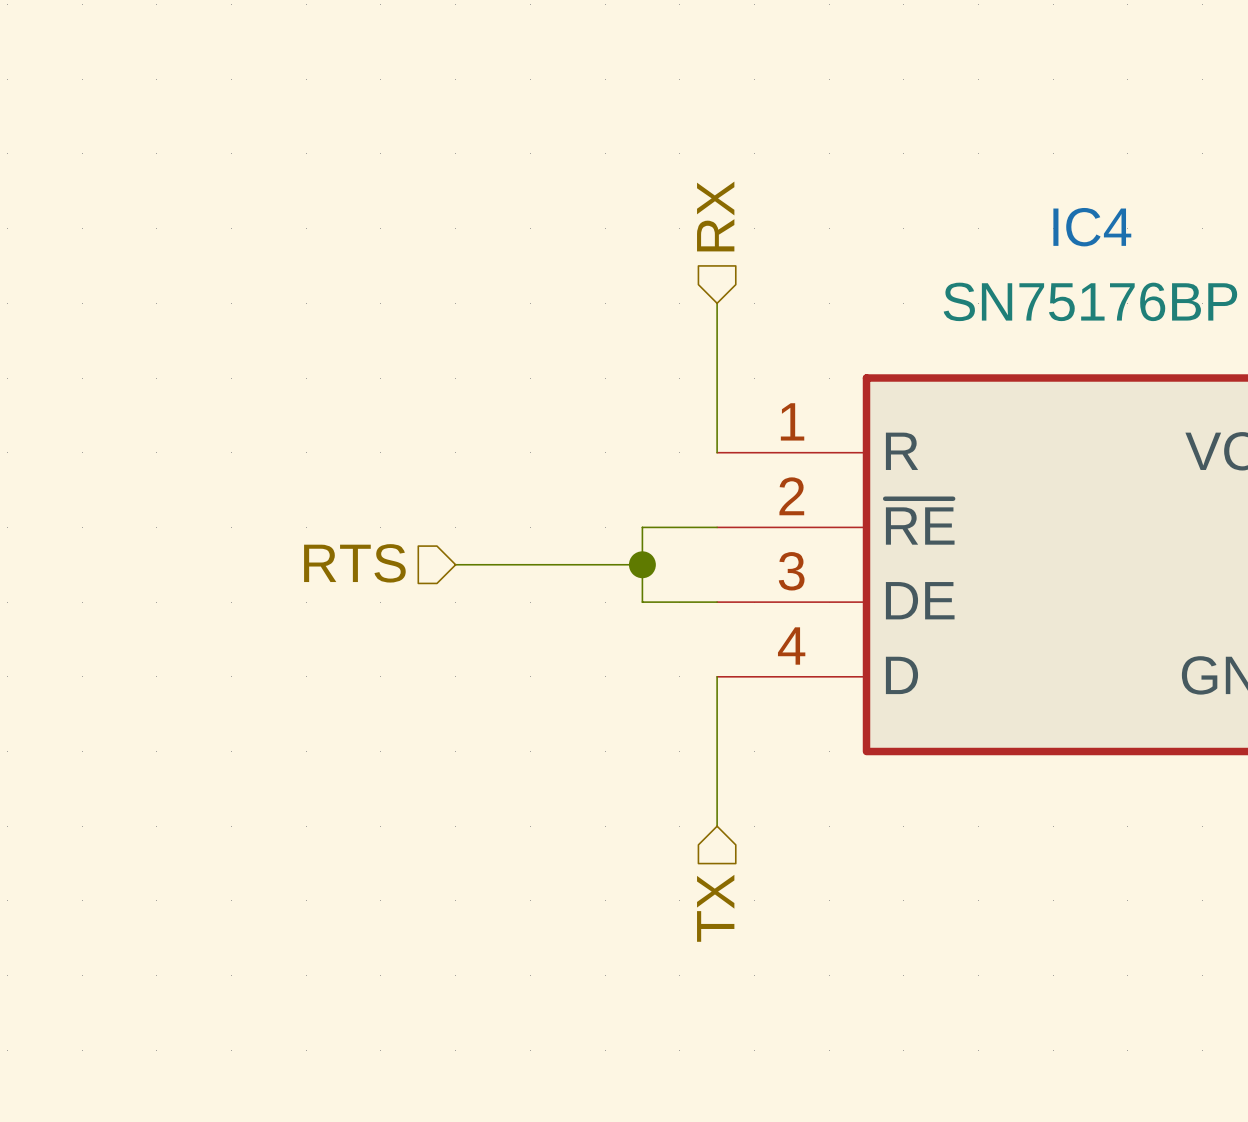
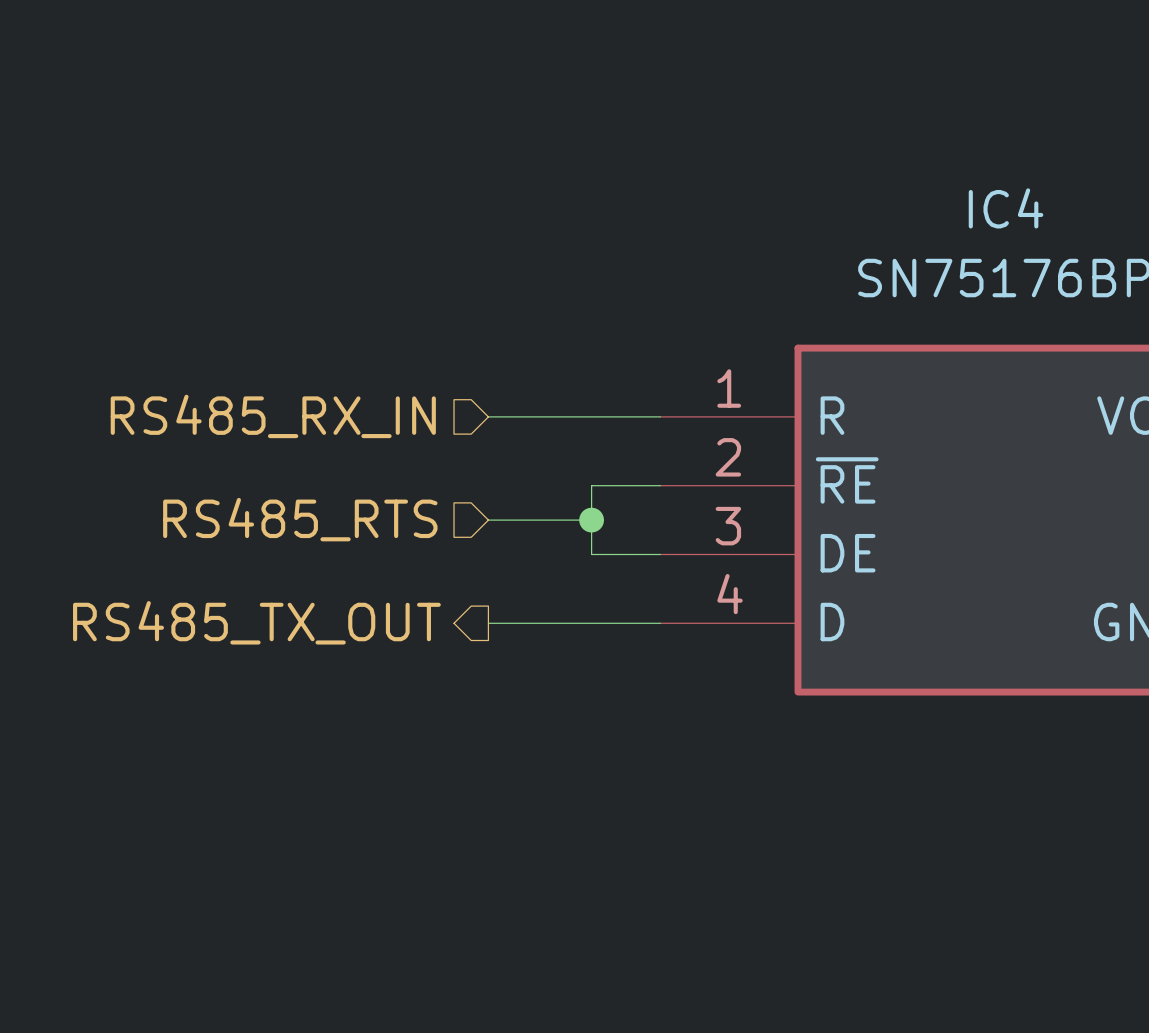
hierarchical label: RX (715, 216) -> none
wire: (717, 303) (717, 452) -> (488, 416) (660, 416)
hierarchical label: none -> RS485_RX_IN (273, 416)
hierarchical label: RTS (354, 563) -> none
wire: (455, 564) (530, 564) -> none
hierarchical label: none -> RS485_RTS (300, 519)
wire: (717, 676) (717, 826) -> (660, 623) (488, 623)
hierarchical label: none -> RS485_TX_OUT (256, 622)
hierarchical label: TX (715, 908) -> none

